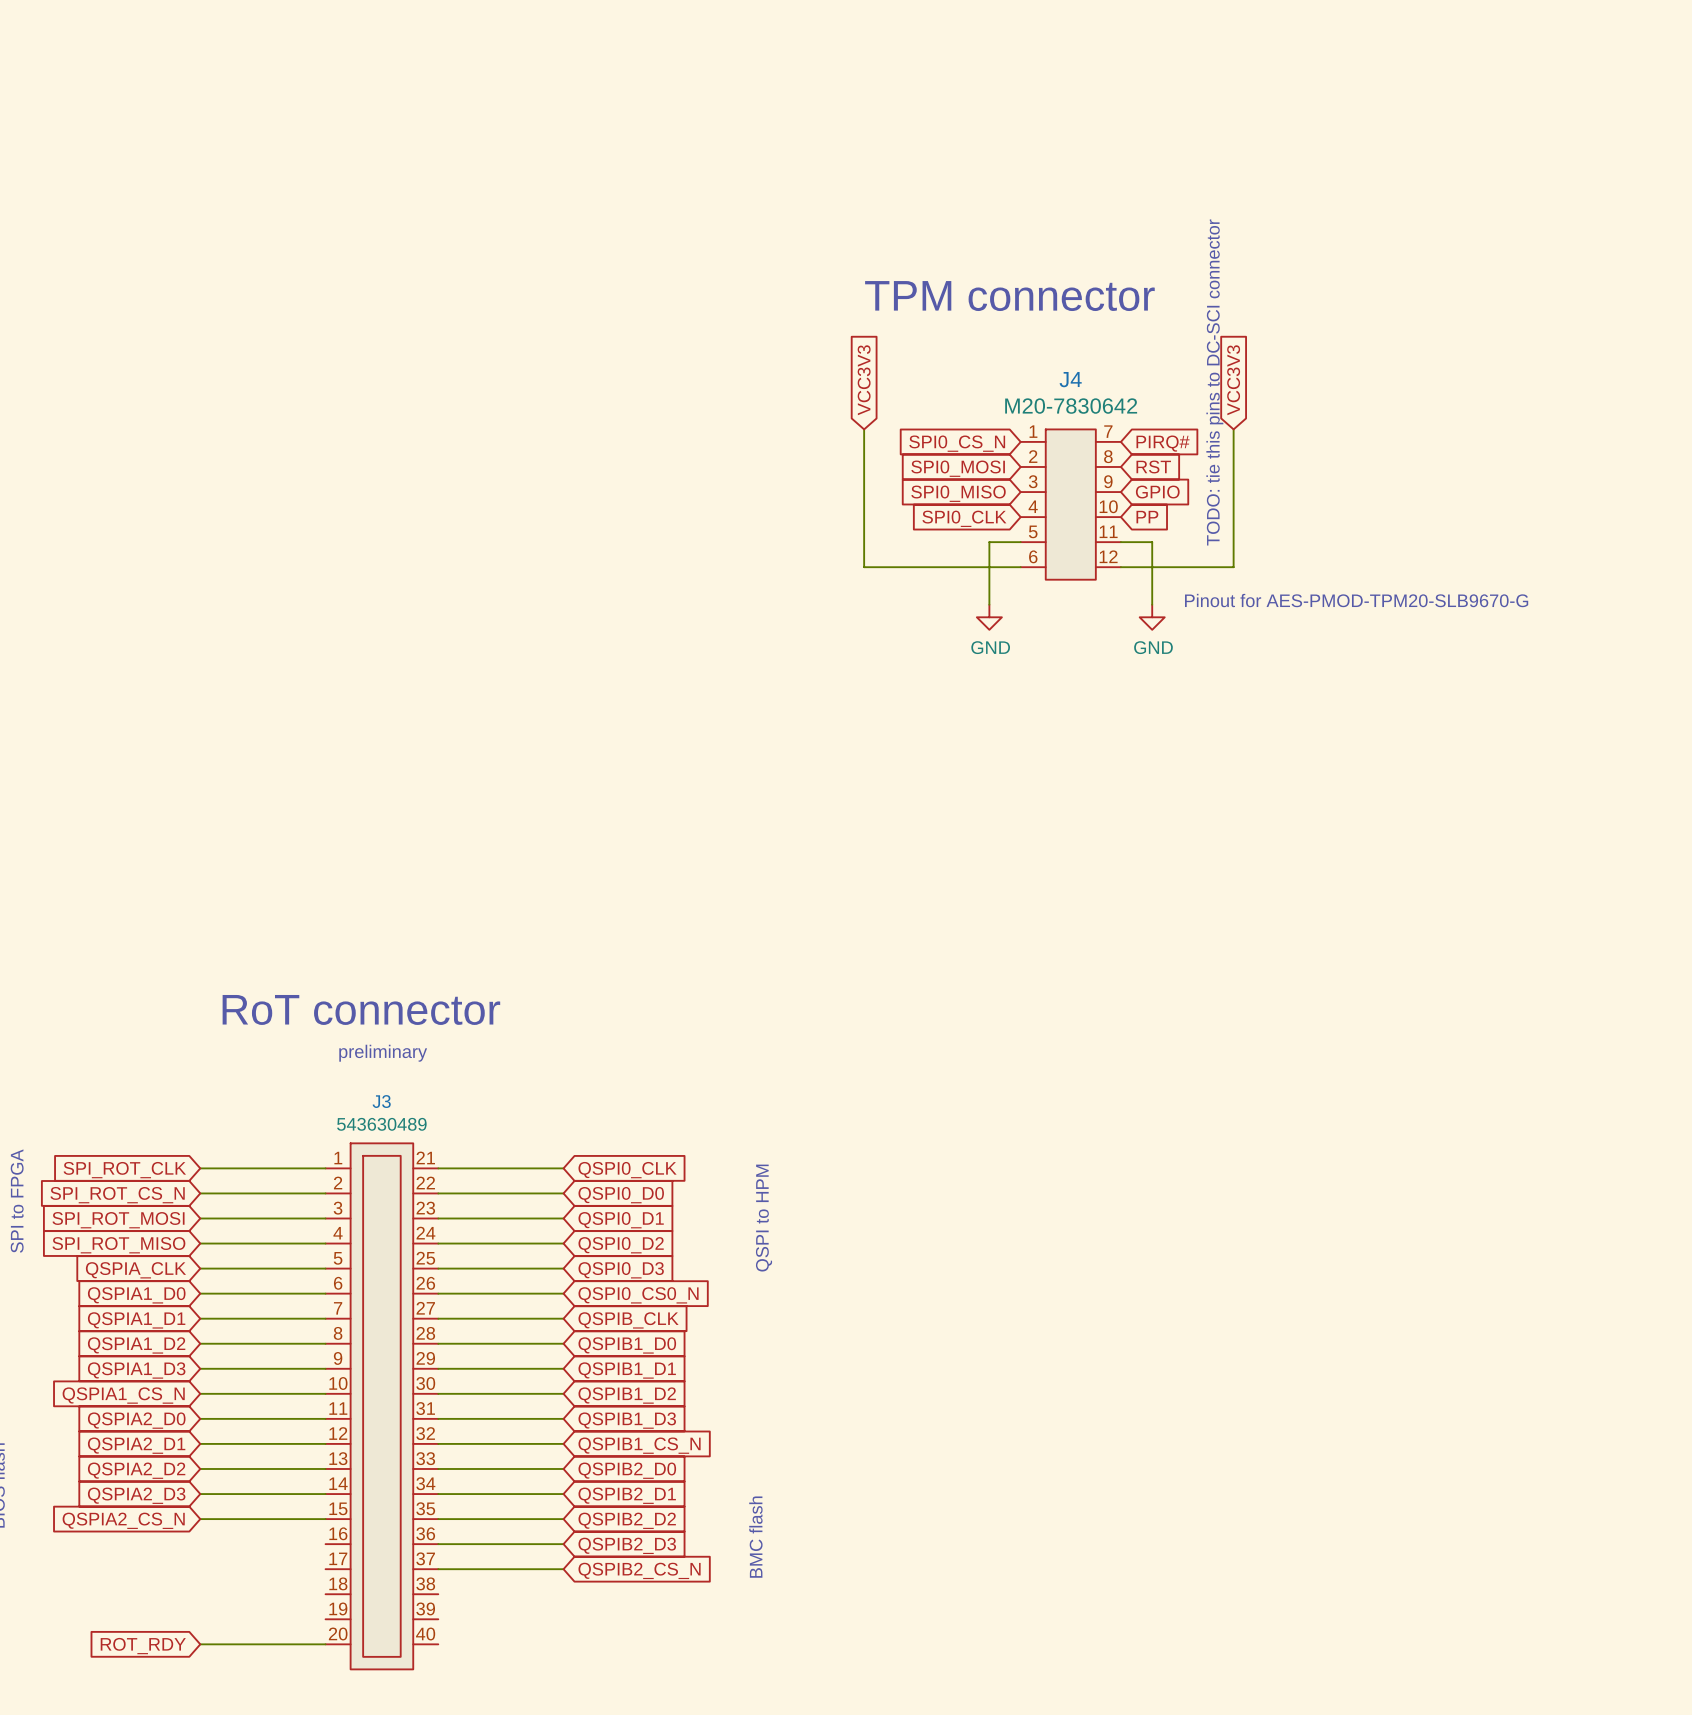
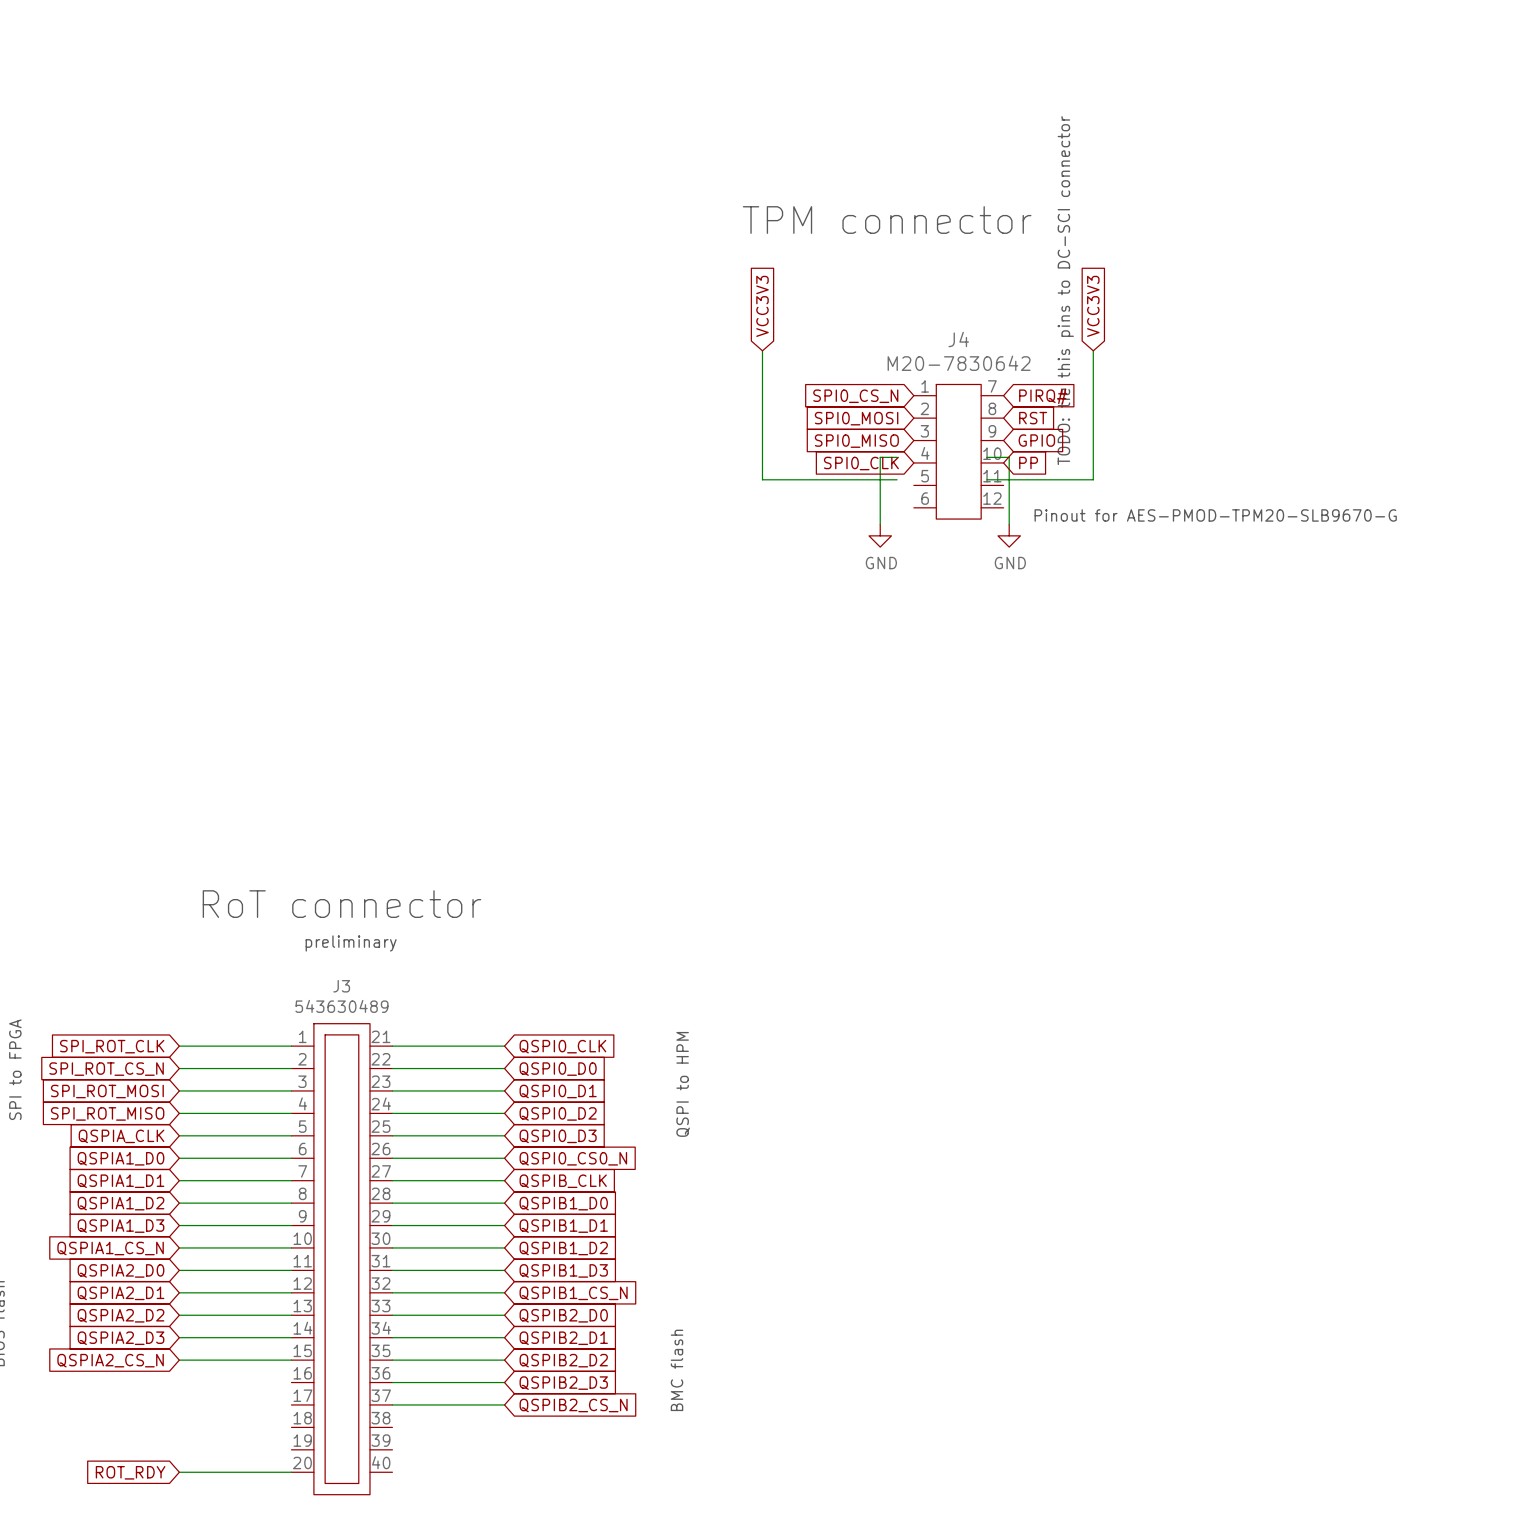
text position: TPM connector (1009, 296) -> TPM connector (887, 220)
global label position: VCC3V3 (864, 380) -> VCC3V3 (762, 306)
global label position: VCC3V3 (1233, 380) -> VCC3V3 (1093, 306)
text position: TODO: tie this pins to DC-SCI connector (1214, 382) -> TODO: tie this pins to DC-SCI connector (1065, 290)
wire: none -> (762, 350) (762, 479) (897, 479)
wire: none -> (1093, 350) (1093, 479) (986, 479)
wire: (864, 429) (864, 567) (1020, 567) -> none
wire: (1233, 429) (1233, 567) (1120, 567) -> none
wire: none -> (897, 457) (880, 457) (880, 524)
wire: none -> (986, 457) (1009, 457) (1009, 524)
wire: (1020, 542) (989, 542) (989, 604) -> none
wire: (1120, 542) (1152, 542) (1152, 604) -> none
text position: Pinout for AES-PMOD-TPM20-SLB9670-G (1356, 600) -> Pinout for AES-PMOD-TPM20-SLB9670-G (1215, 515)
power symbol position: GND (989, 617) -> GND (880, 535)
power symbol position: GND (1152, 617) -> GND (1009, 535)

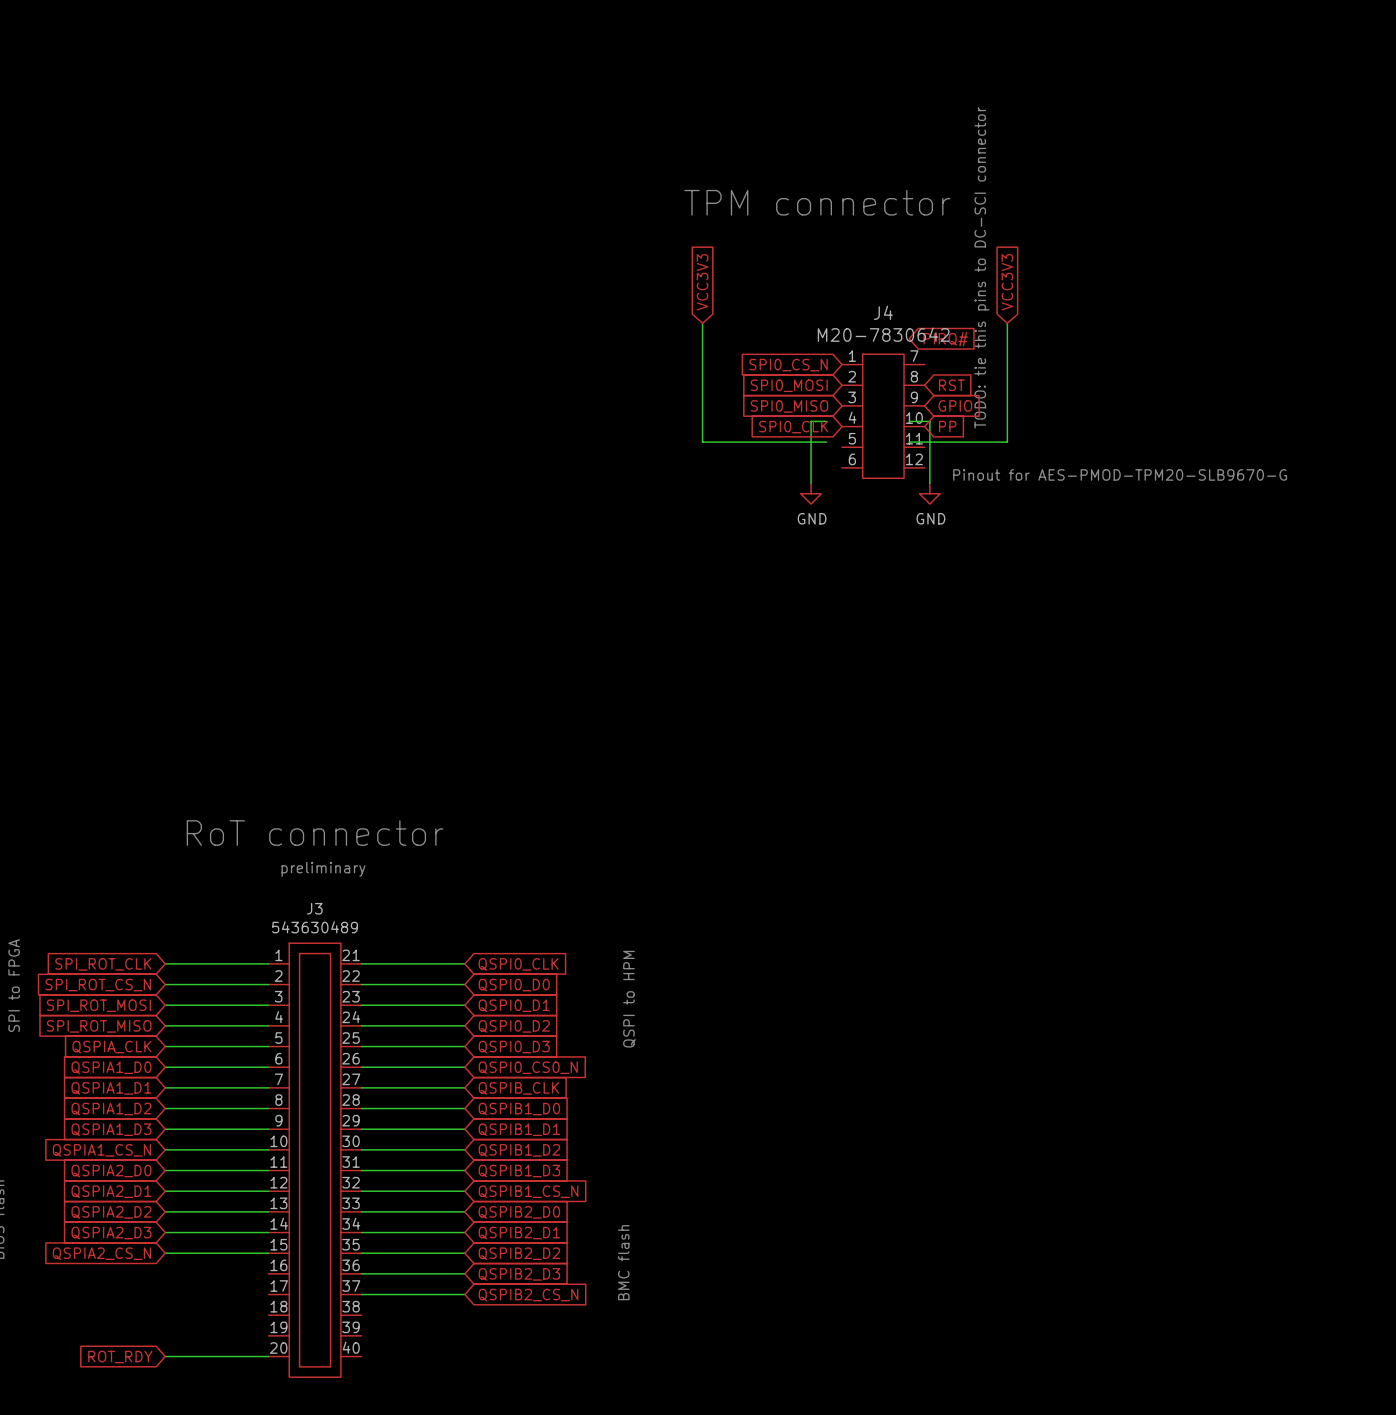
global label position: PIRQ# (1043, 396) -> PIRQ# (945, 339)

